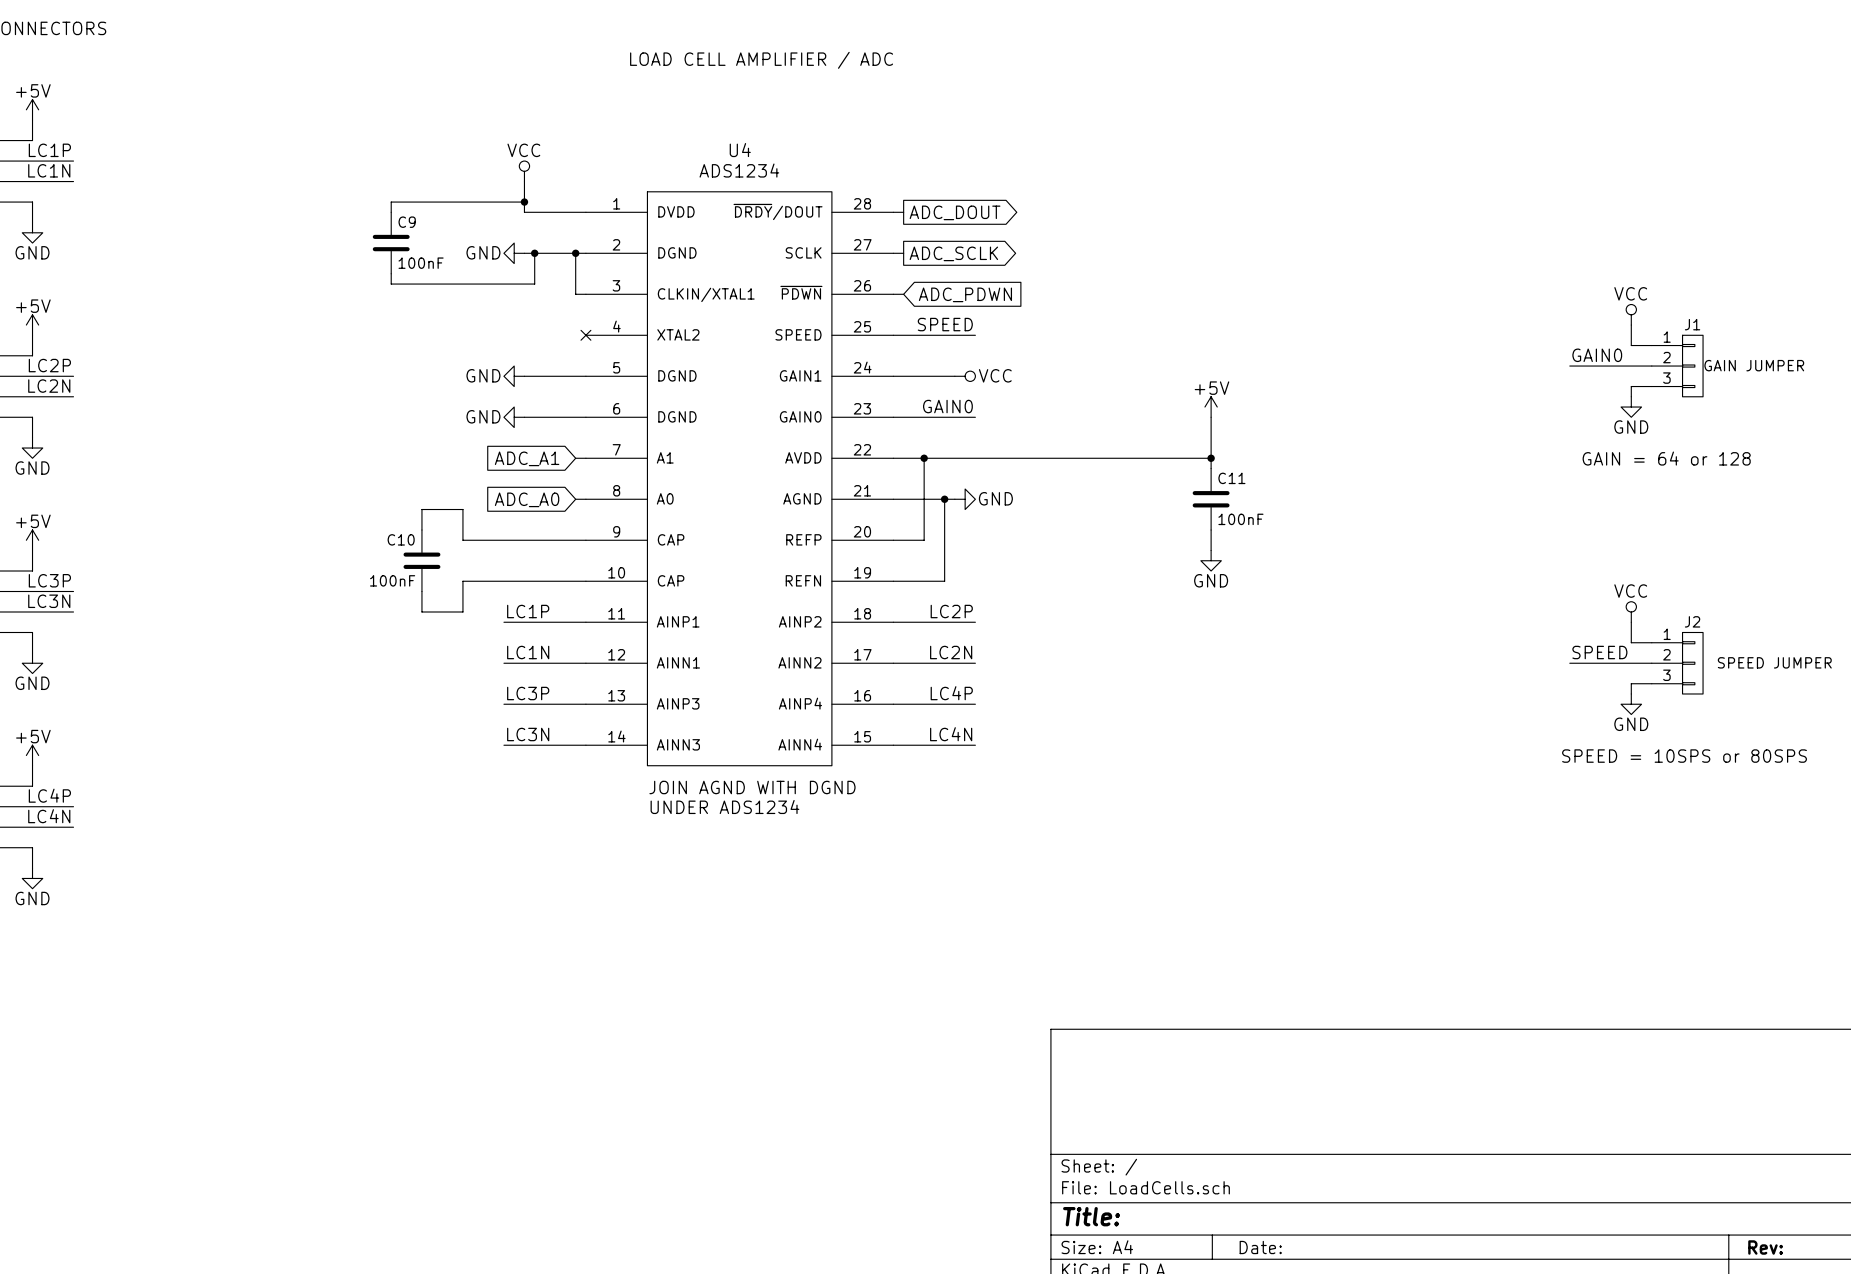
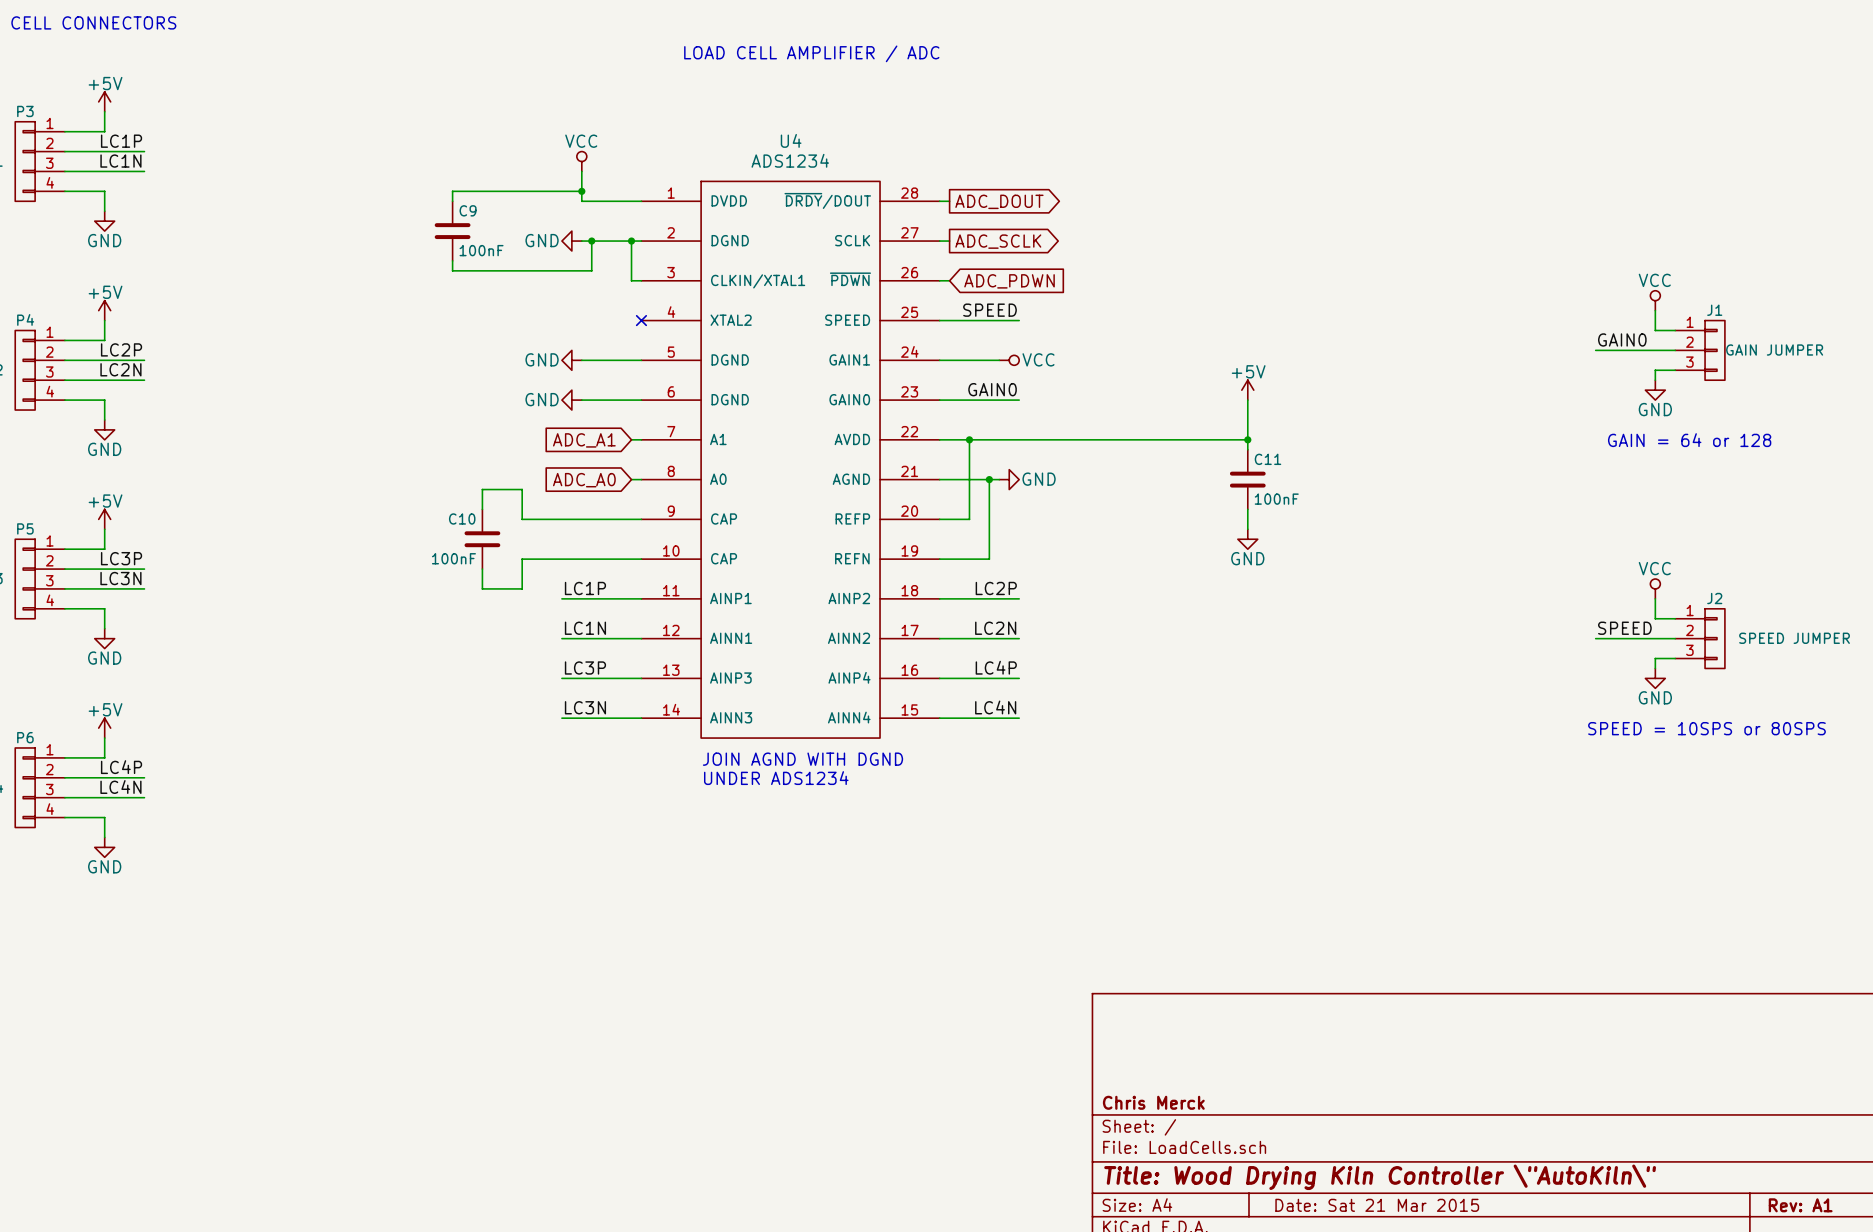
title block: none -> Chris Merck (1153, 1102)
title block: Title: (1091, 1216) -> Title: Wood Drying Kiln Controller \"AutoKiln\" (1380, 1177)
title block: Date: (1260, 1247) -> Date: Sat 21 Mar 2015 (1377, 1205)
title block: Rev: (1765, 1247) -> Rev: A1 (1800, 1205)

